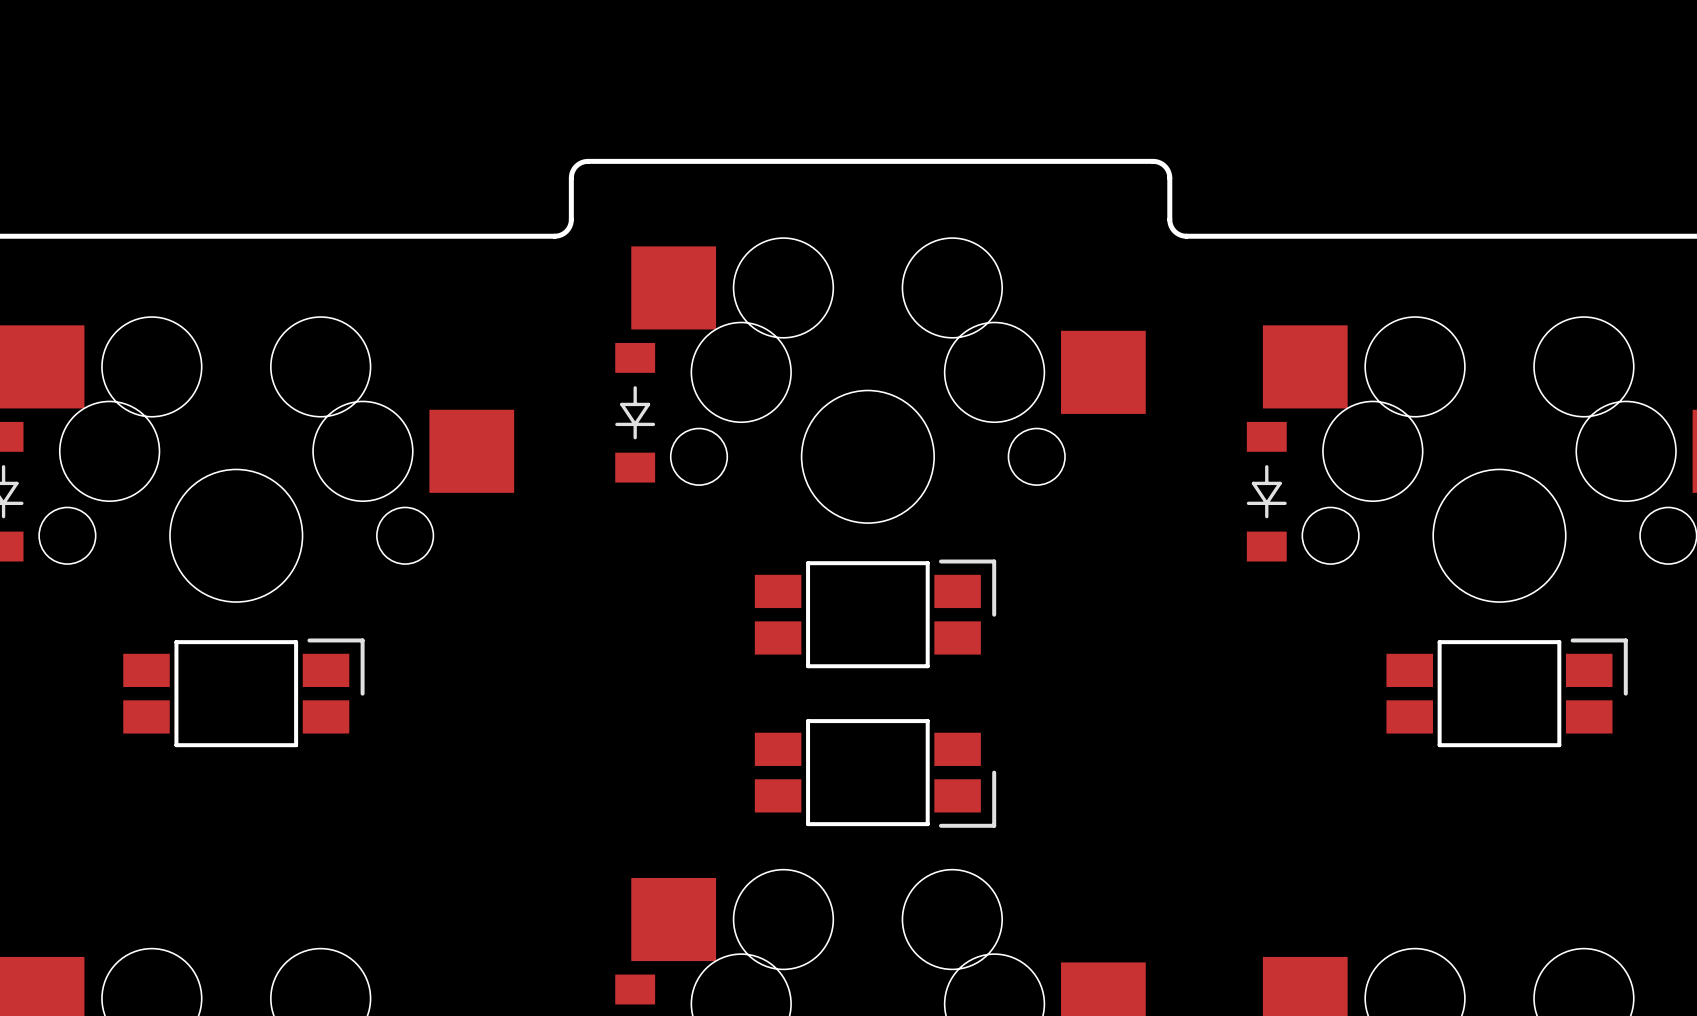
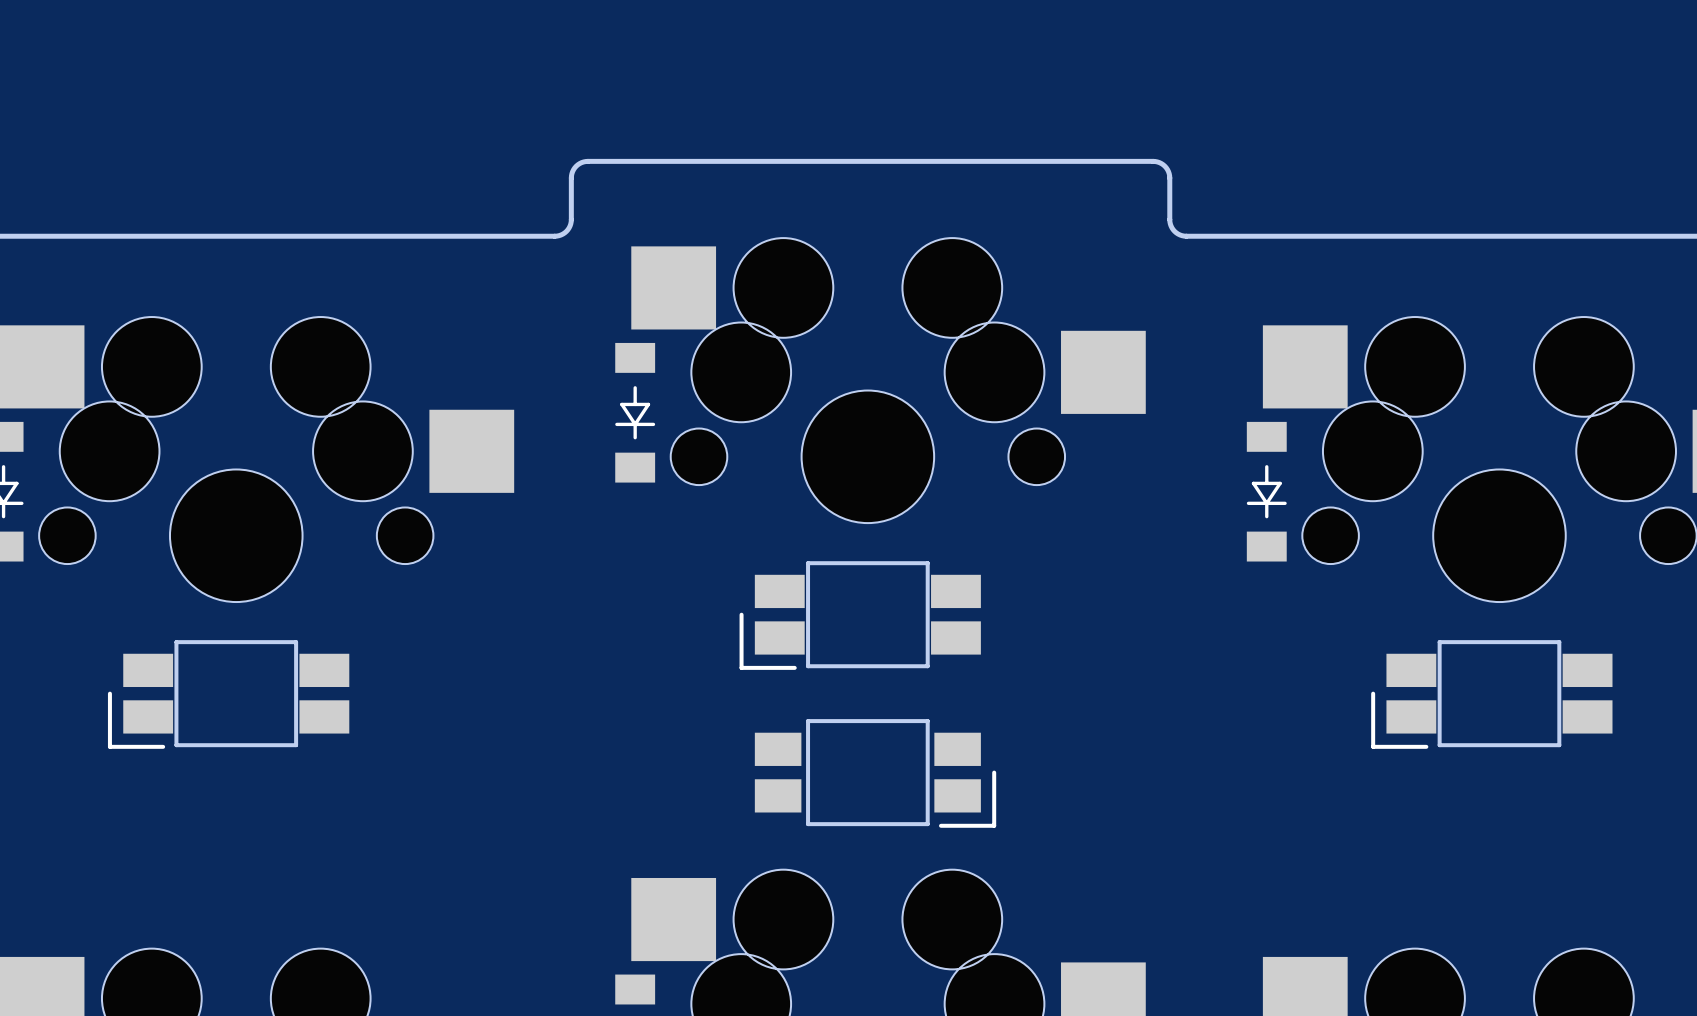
part footprint: [754, 559, 997, 669] -> [739, 561, 981, 670]
part footprint: [123, 638, 365, 748] -> [107, 640, 350, 749]
part footprint: [1386, 638, 1628, 748] -> [1371, 640, 1613, 749]

